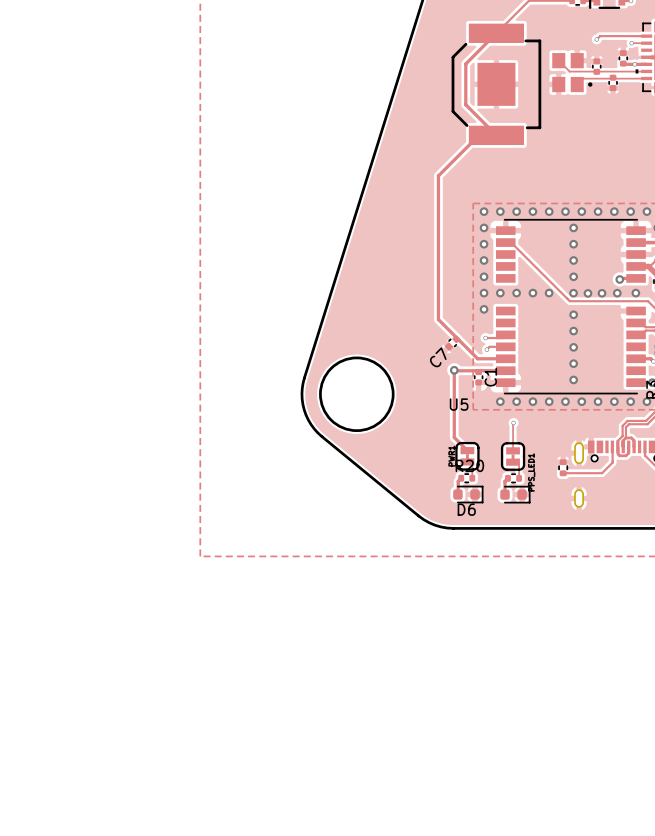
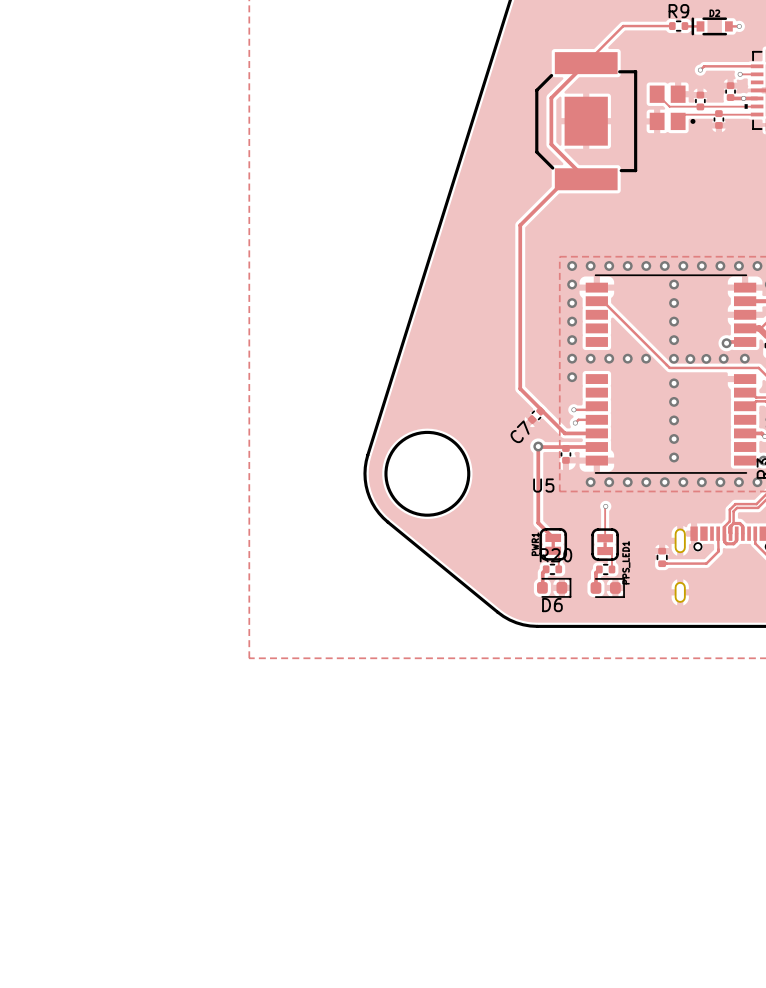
C1 name: C1 (490, 377) -> none

